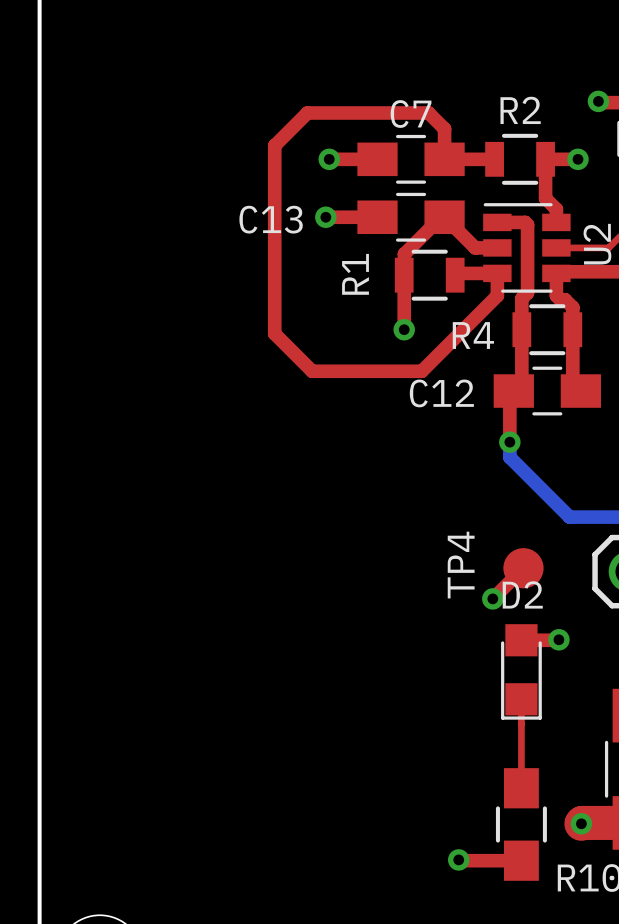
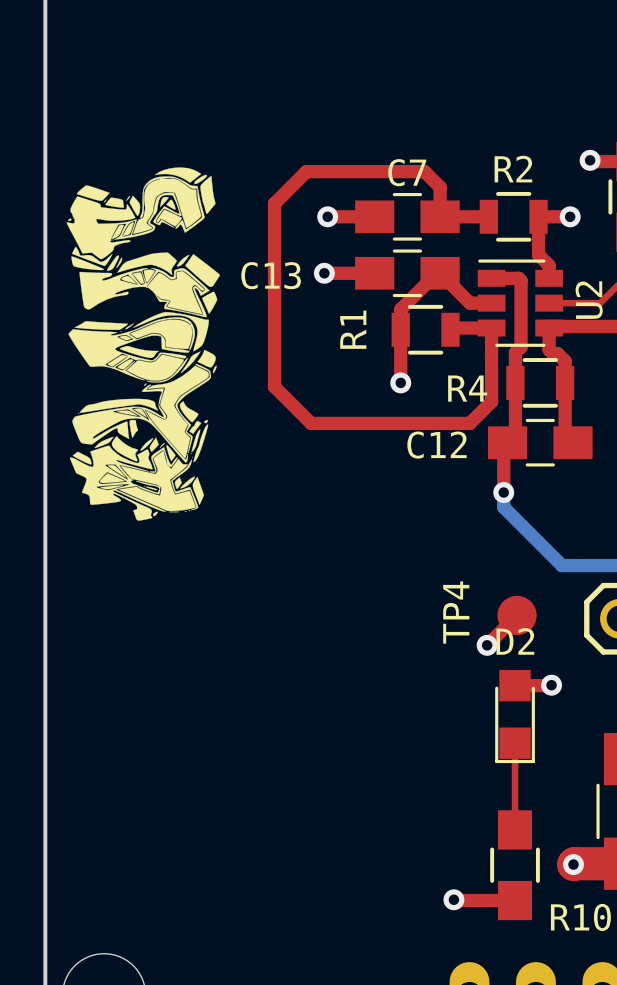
drawing: none -> [66, 167, 221, 521]
top track: (497, 295) (421, 371) -> (491, 349) (491, 401) (469, 423) (417, 423)

